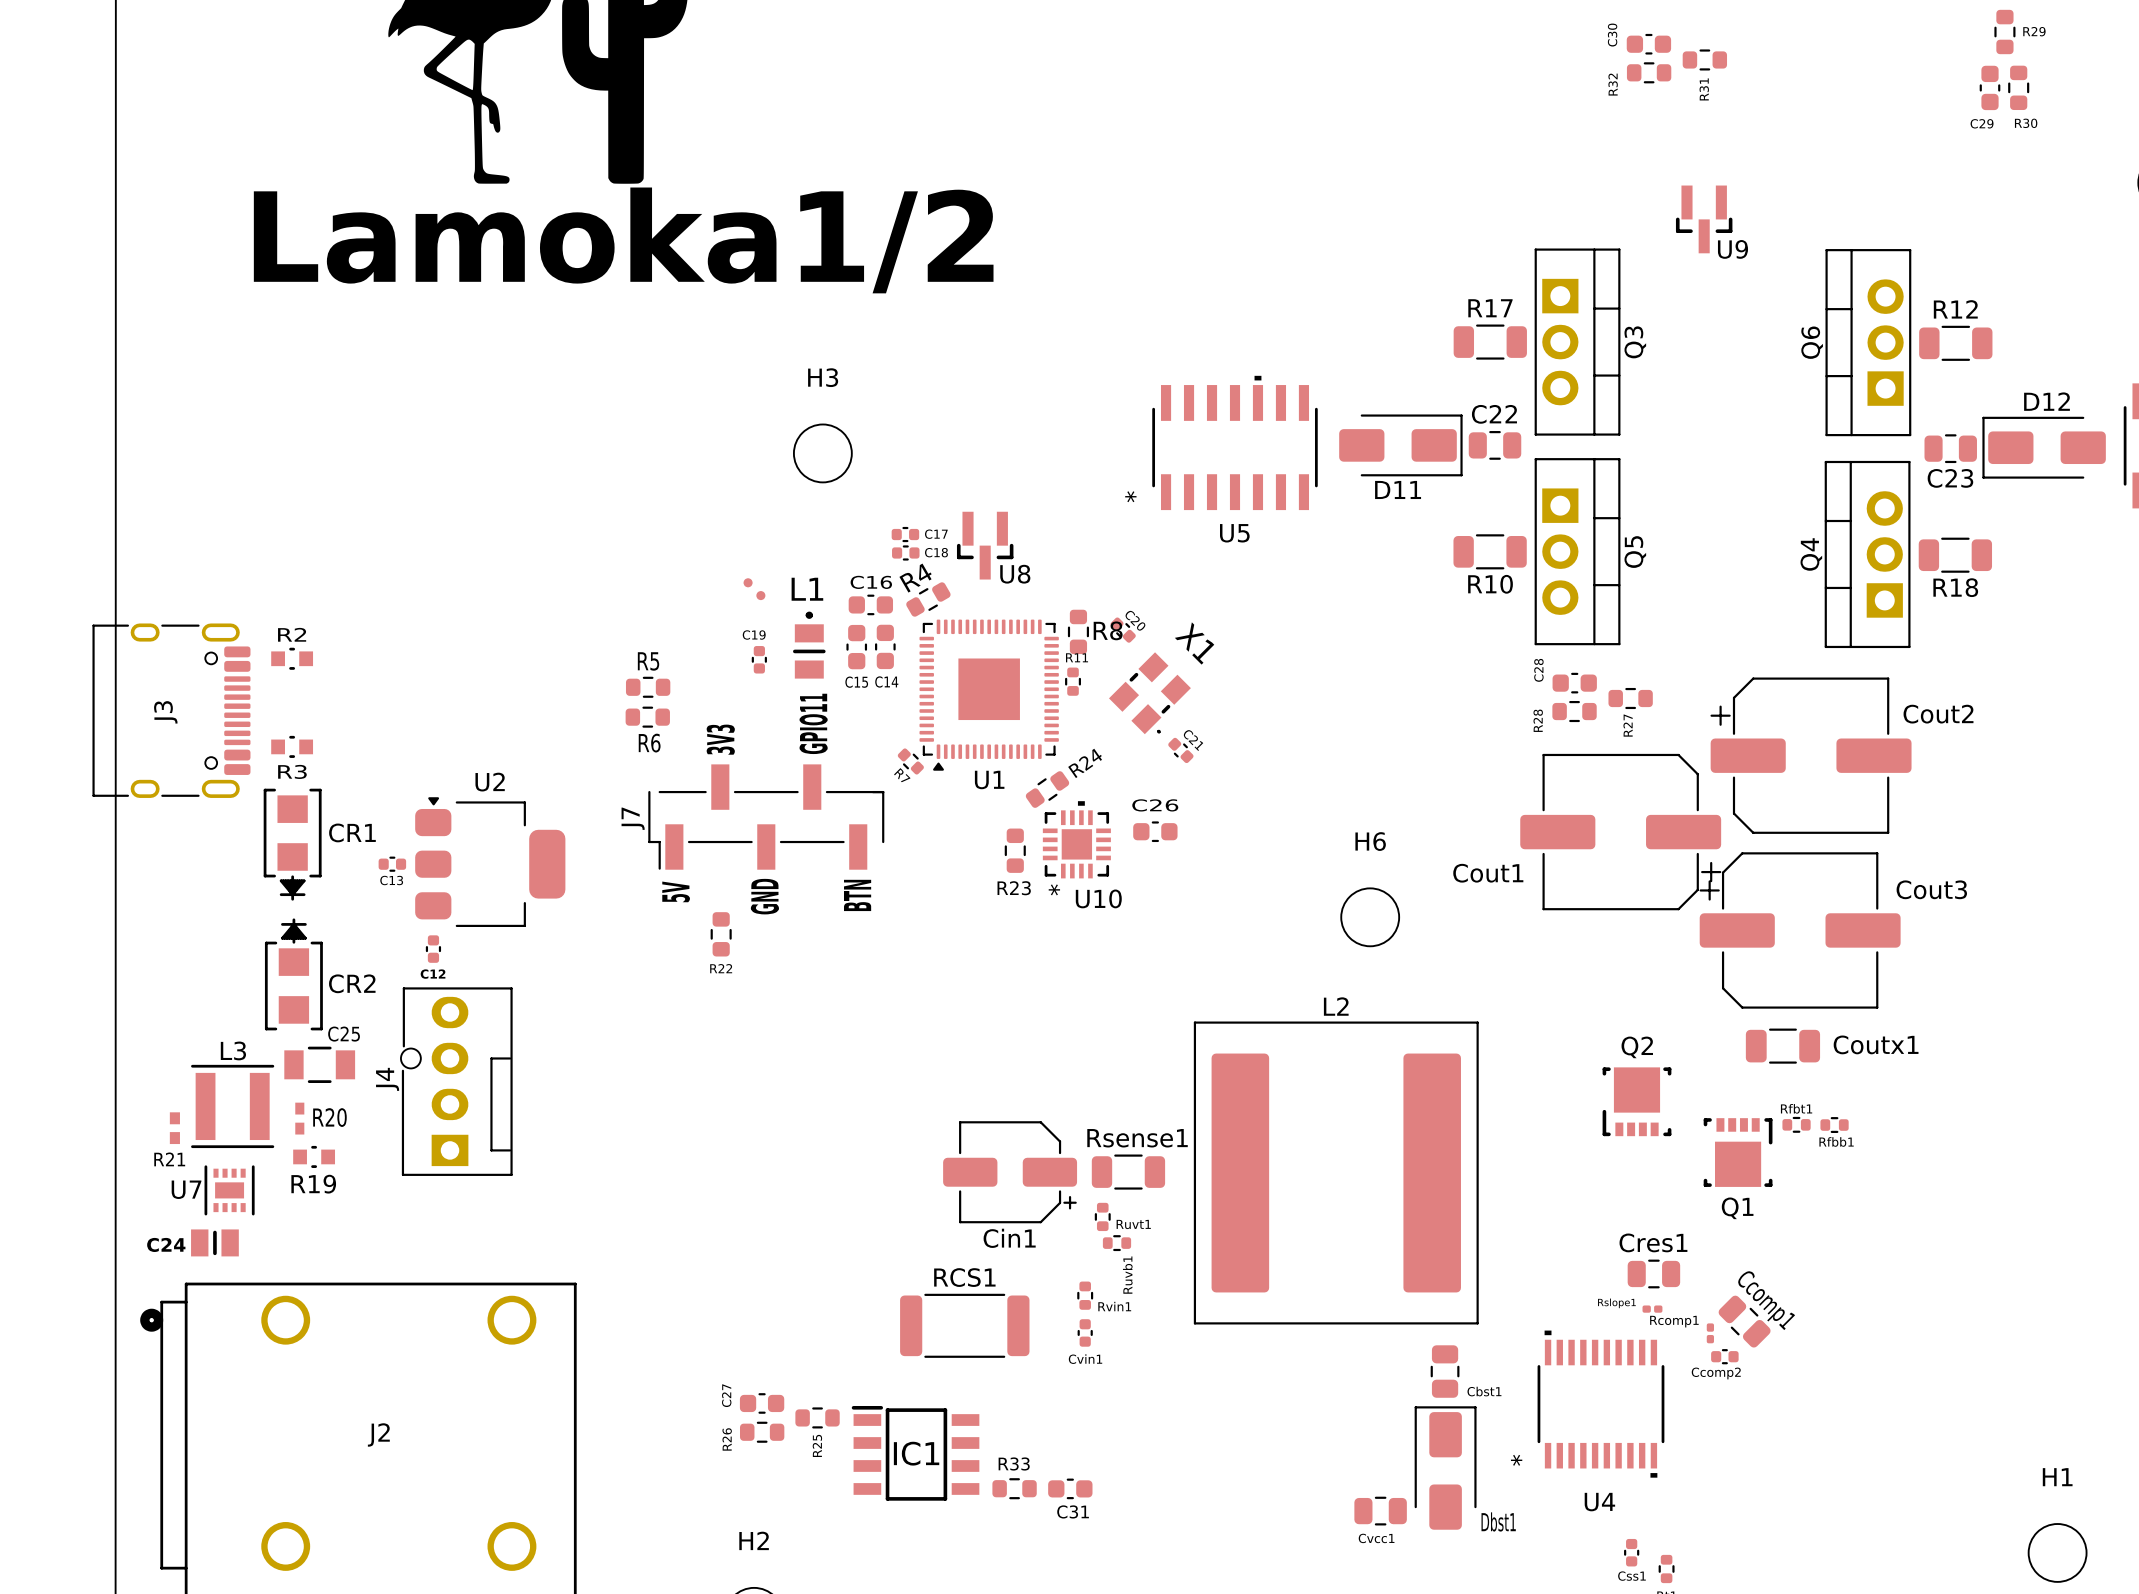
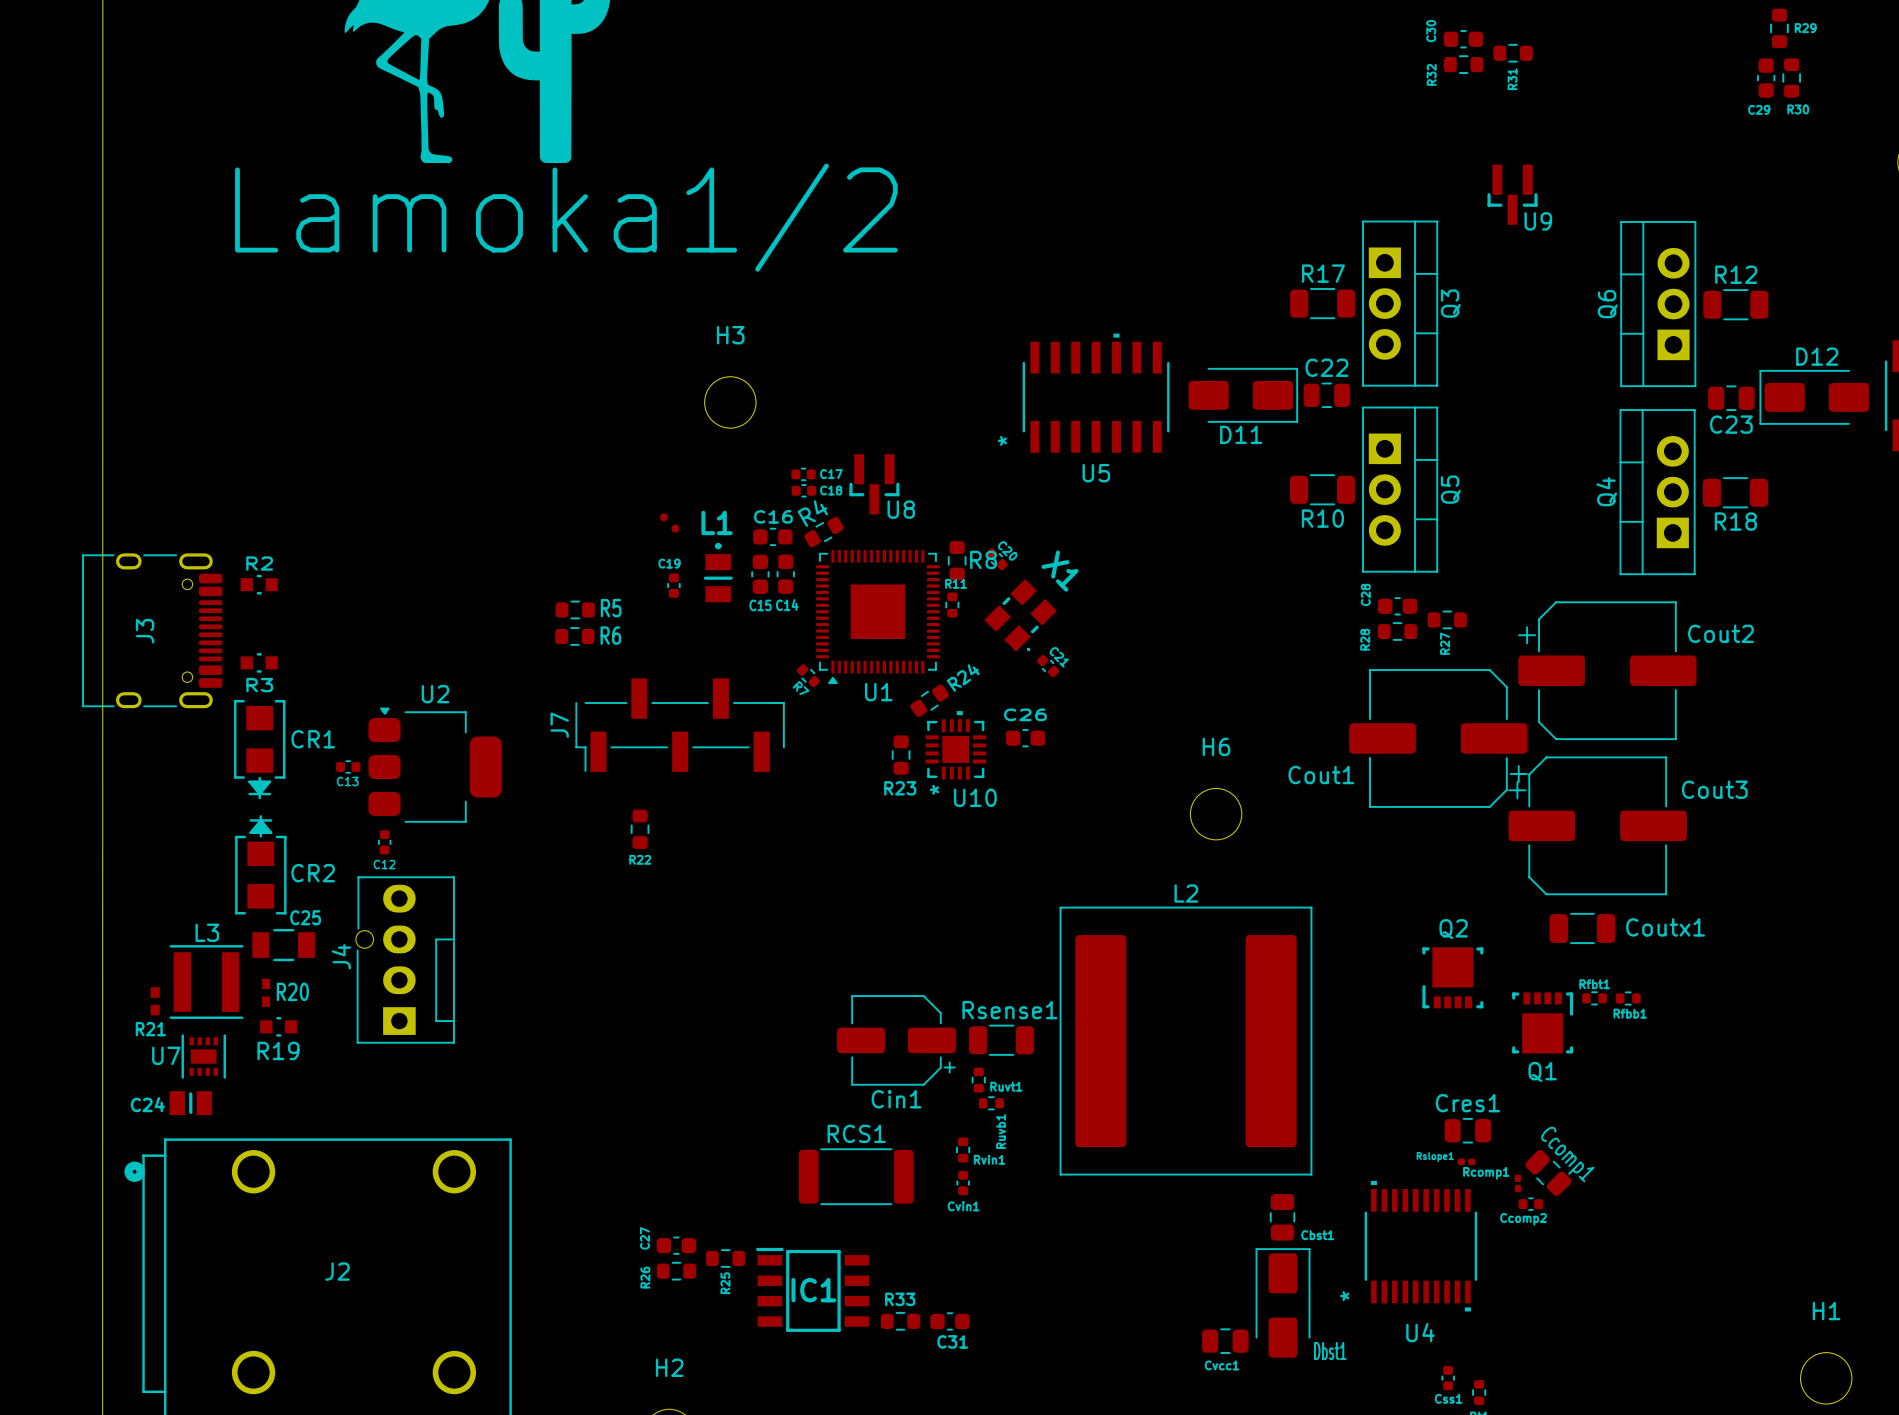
R5 name position: R5 (648, 661) -> R5 (611, 608)
text: GPIO11 (813, 723) -> none
text: 3V3 (720, 739) -> none
R6 name position: R6 (649, 743) -> R6 (610, 635)
text: 5V (676, 891) -> none
text: BTN (857, 895) -> none
text: GND (764, 896) -> none

